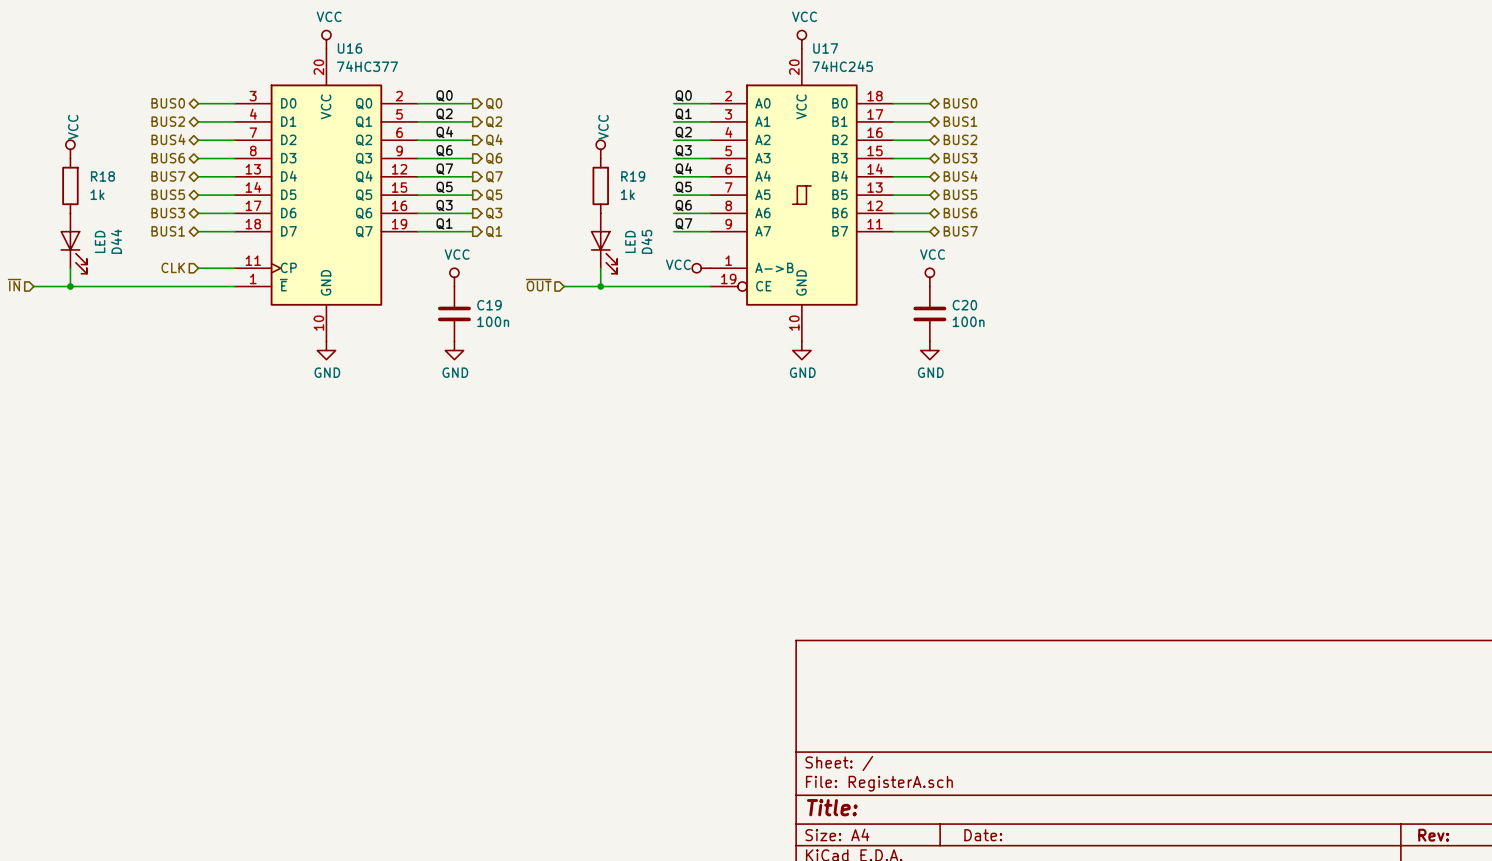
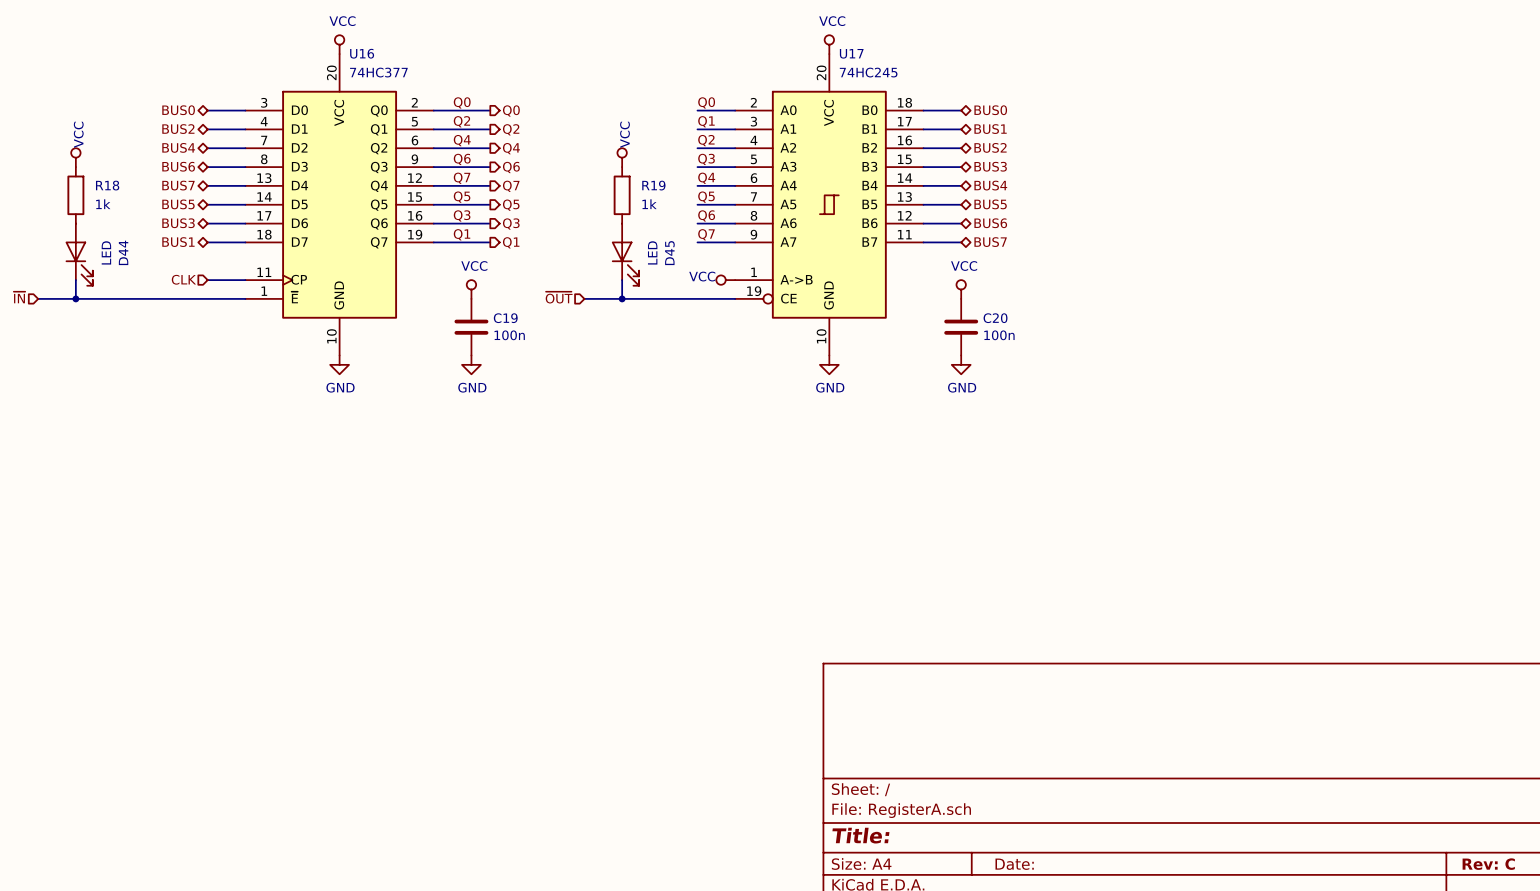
title block: Rev: (1433, 835) -> Rev: C (1488, 864)

